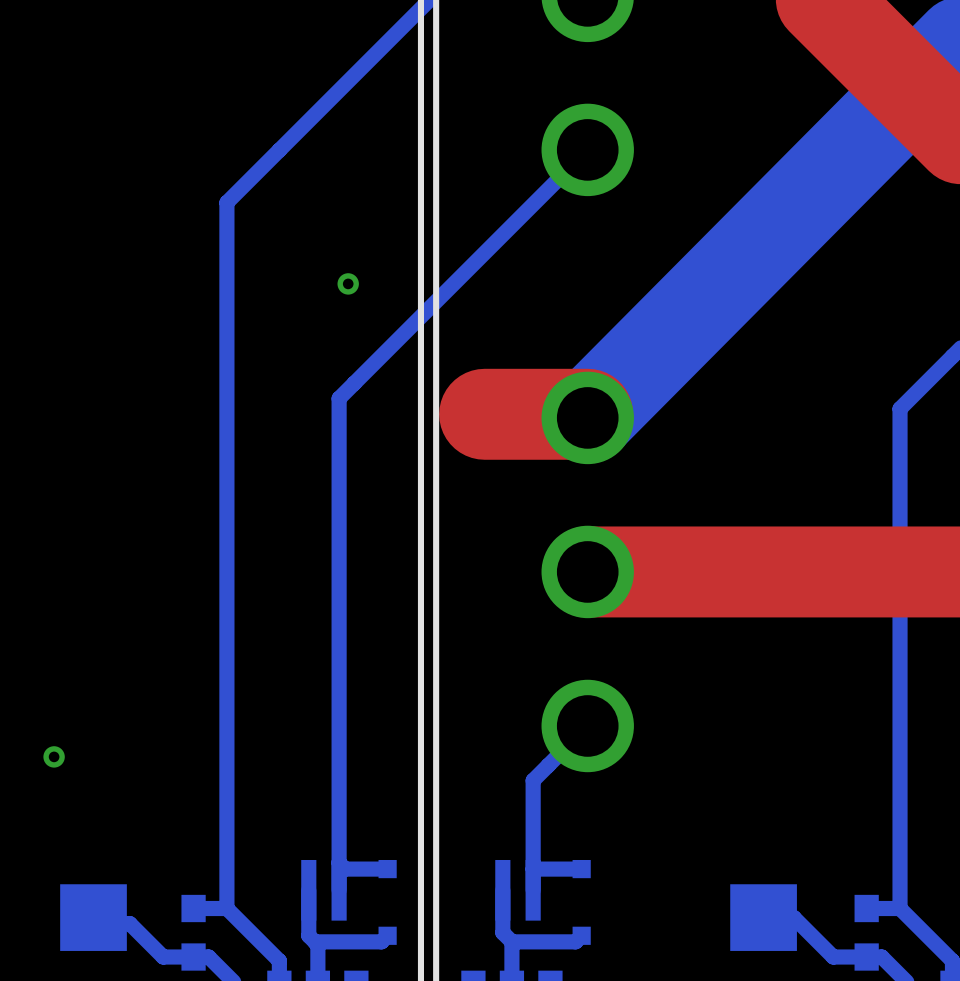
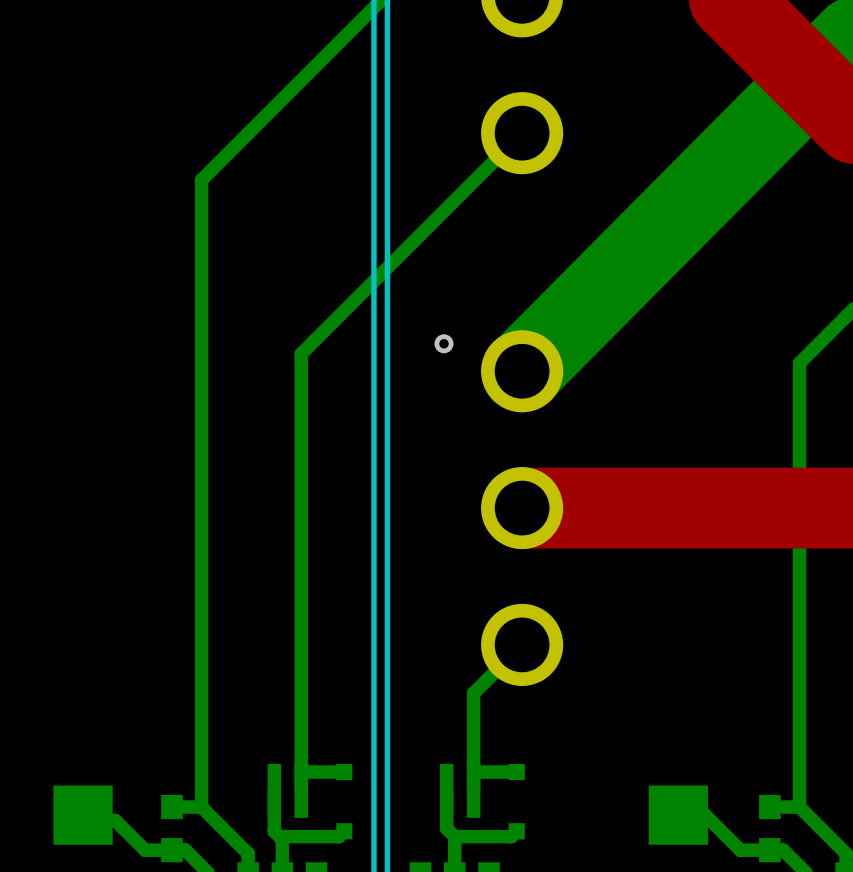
via: (348, 283) -> none
via: none -> (443, 343)
top track: (484, 414) (587, 414) -> none
via: (54, 756) -> none

